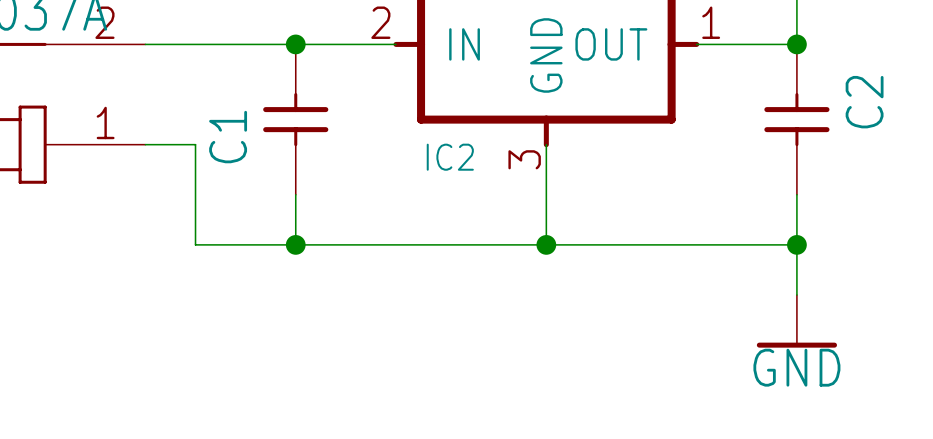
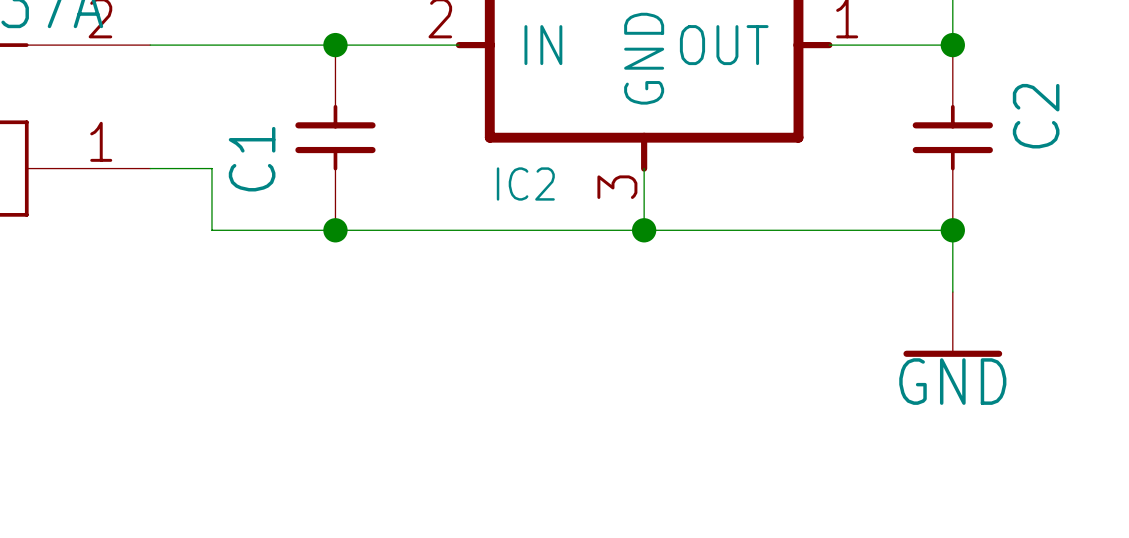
wire: (195, 194) (195, 244) (796, 244) (796, 295) -> (211, 230) (952, 230)
wire: (295, 194) (295, 244) -> none
wire: (546, 194) (546, 244) -> none
junction position: (295, 244) -> (335, 230)
junction position: (546, 244) -> (644, 230)
junction position: (796, 244) -> (952, 230)
power symbol position: GND (796, 321) -> GND (952, 324)

